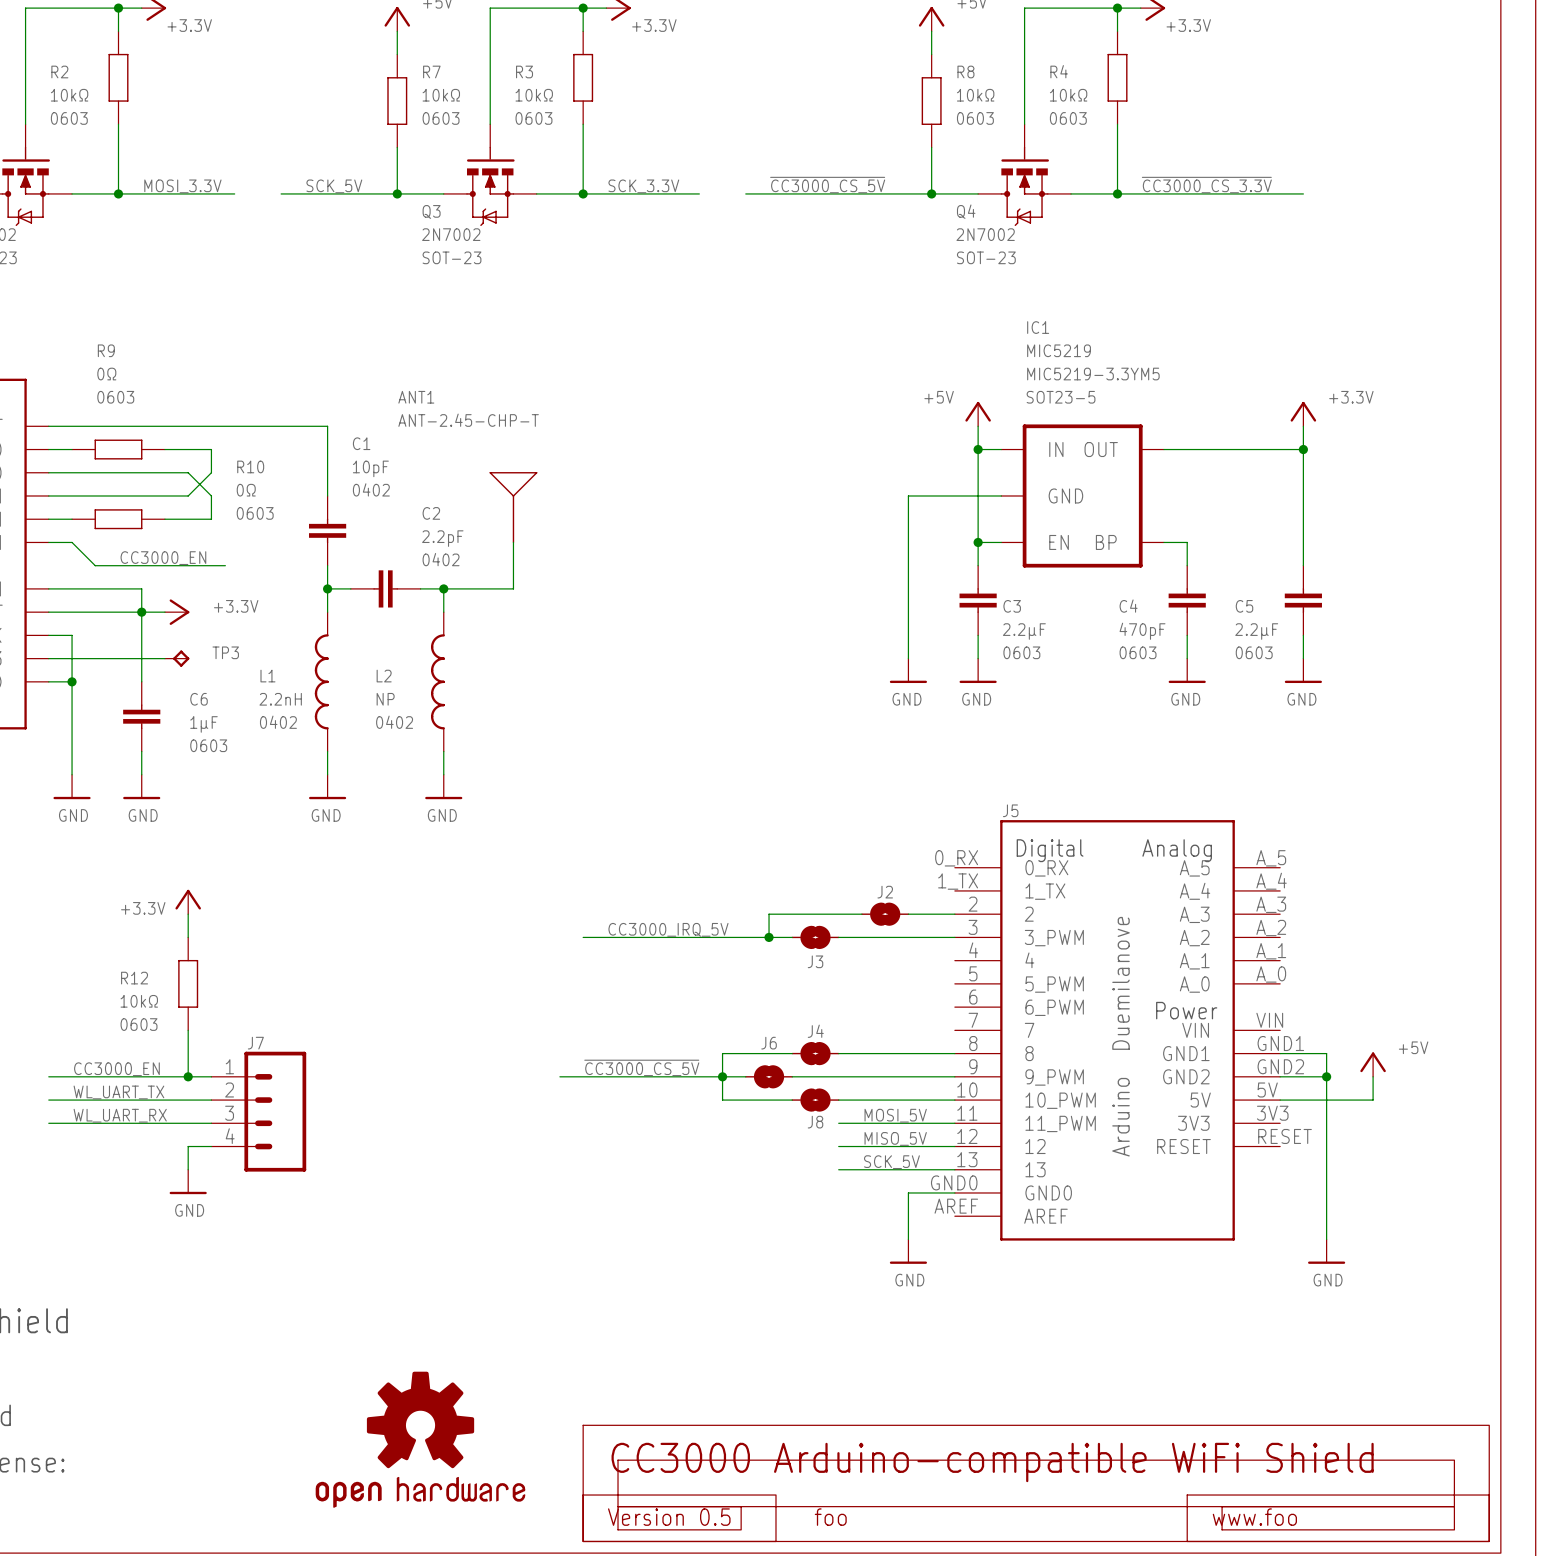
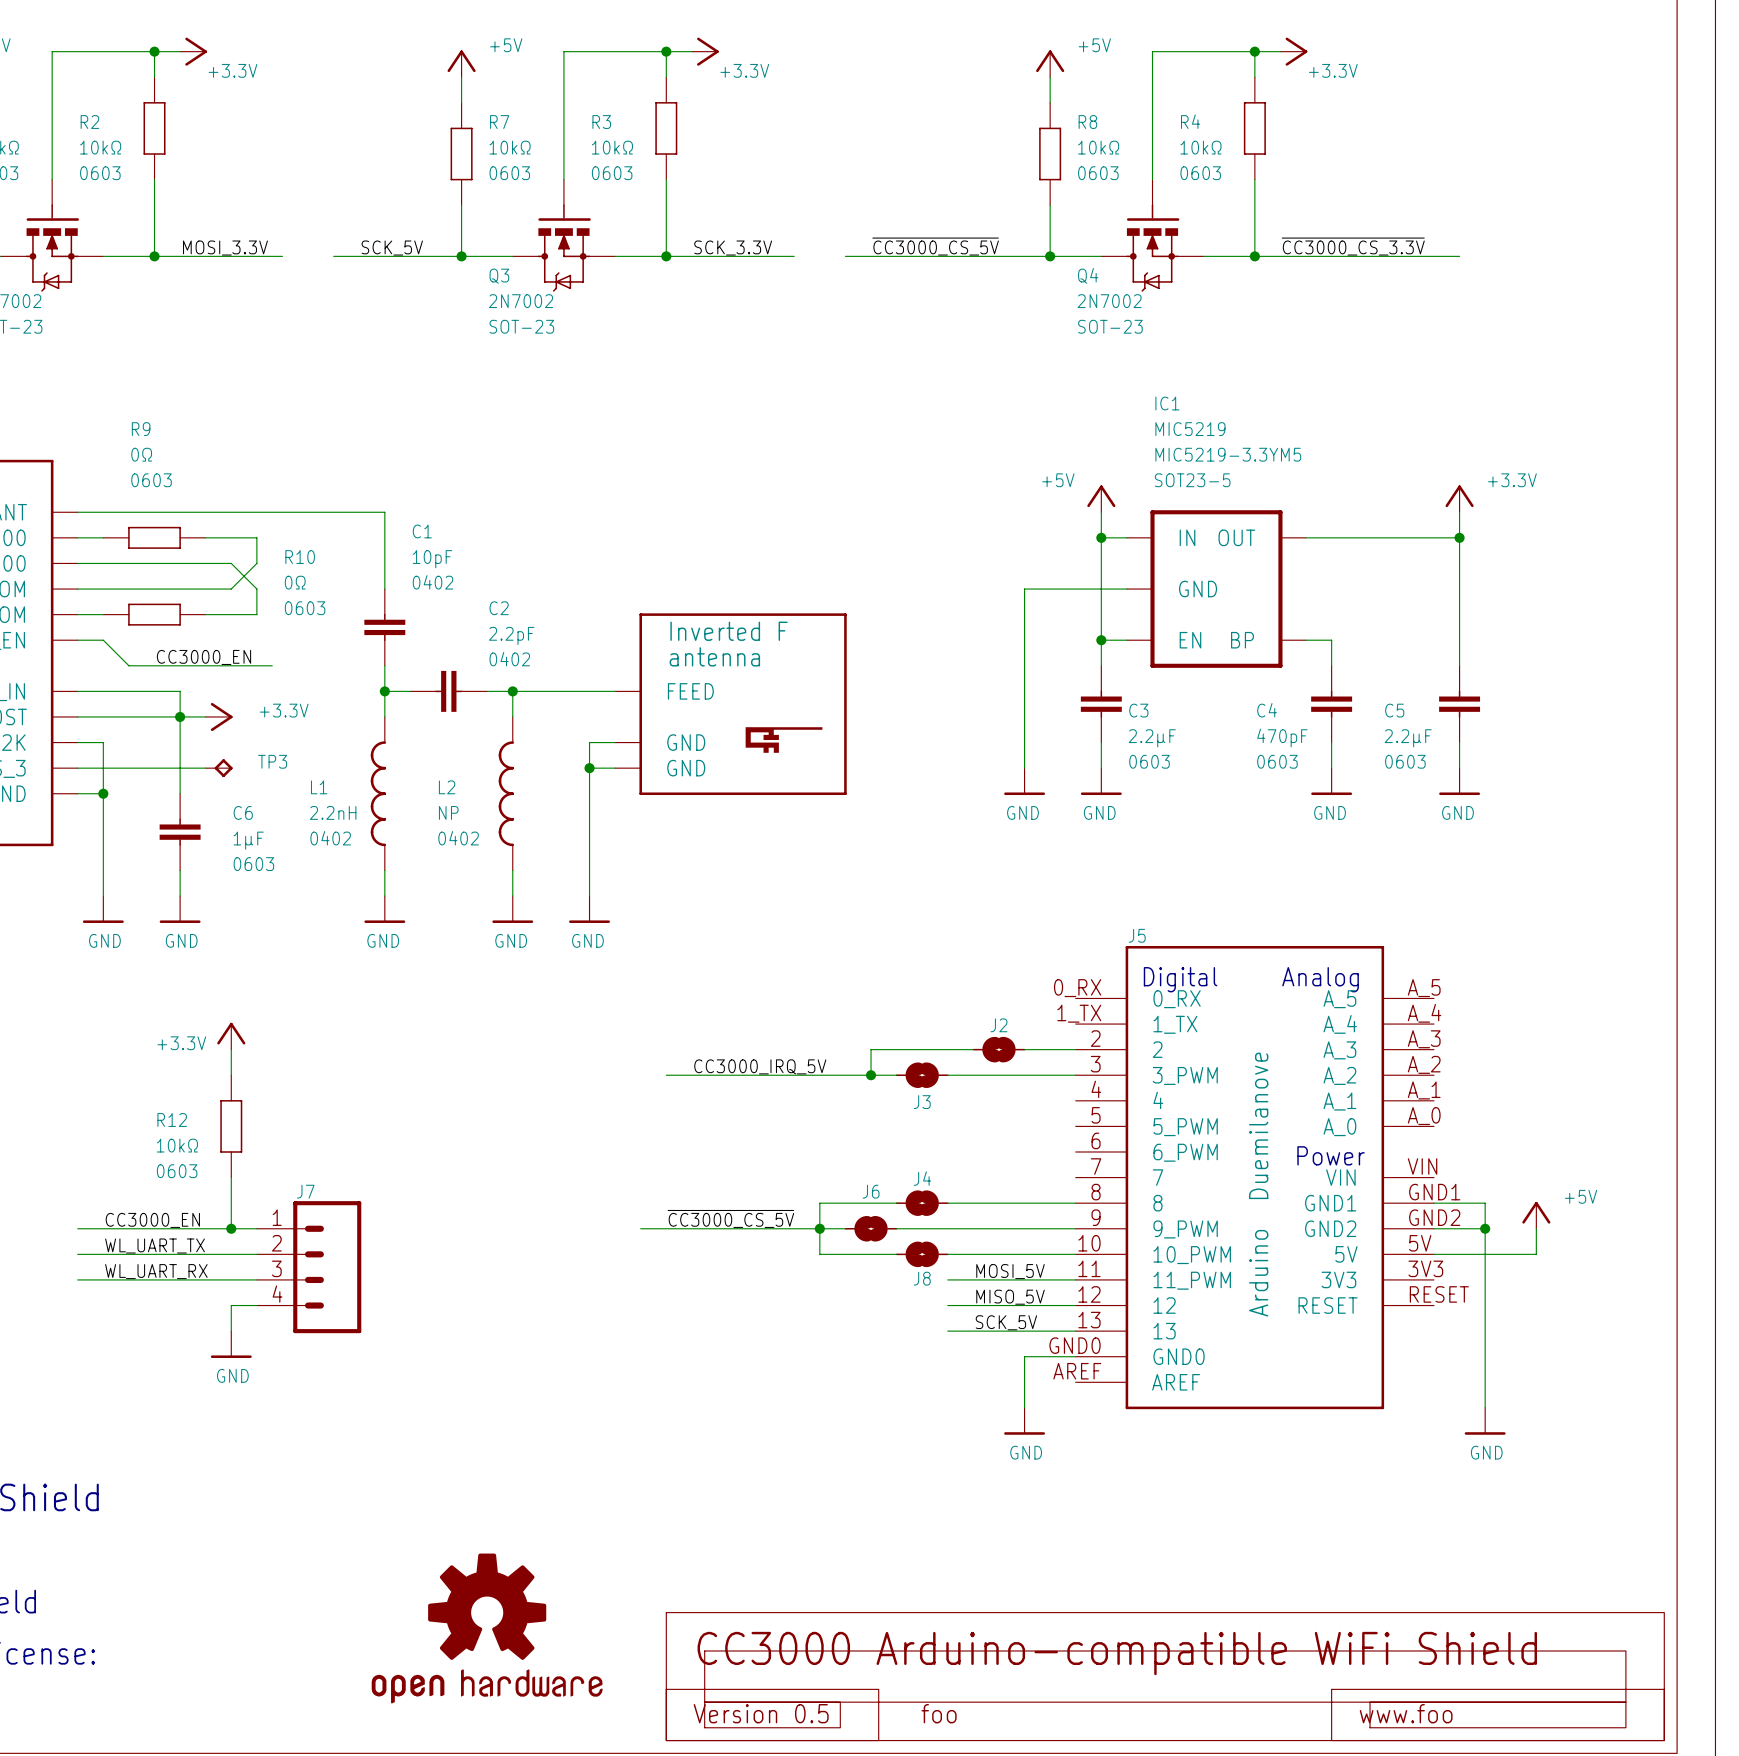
ANT1: ANT-2.45-CHP-T (513, 507) -> none
wire: (513, 542) (513, 588) -> (615, 691) (589, 691)
part: none -> (730, 704)
wire: none -> (615, 742) (589, 742) (589, 896)
wire: none -> (589, 768) (615, 768)
junction: none -> (589, 768)
power symbol: none -> GND (589, 909)

